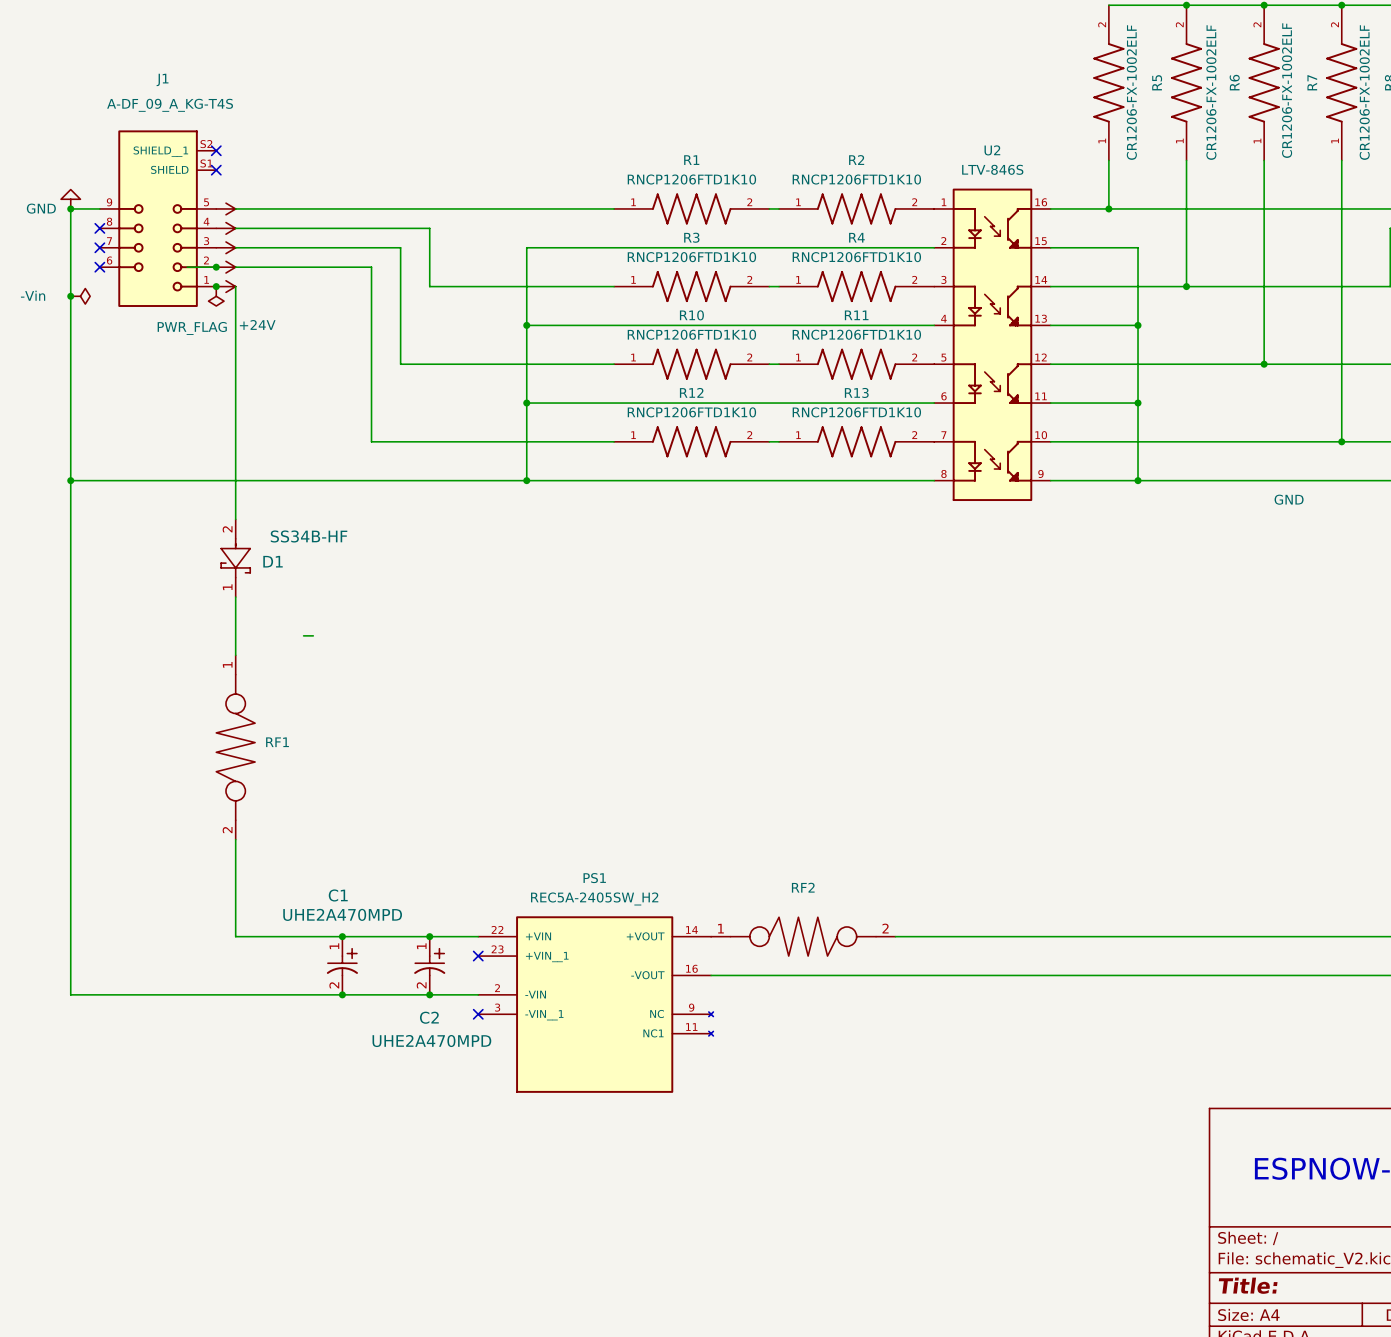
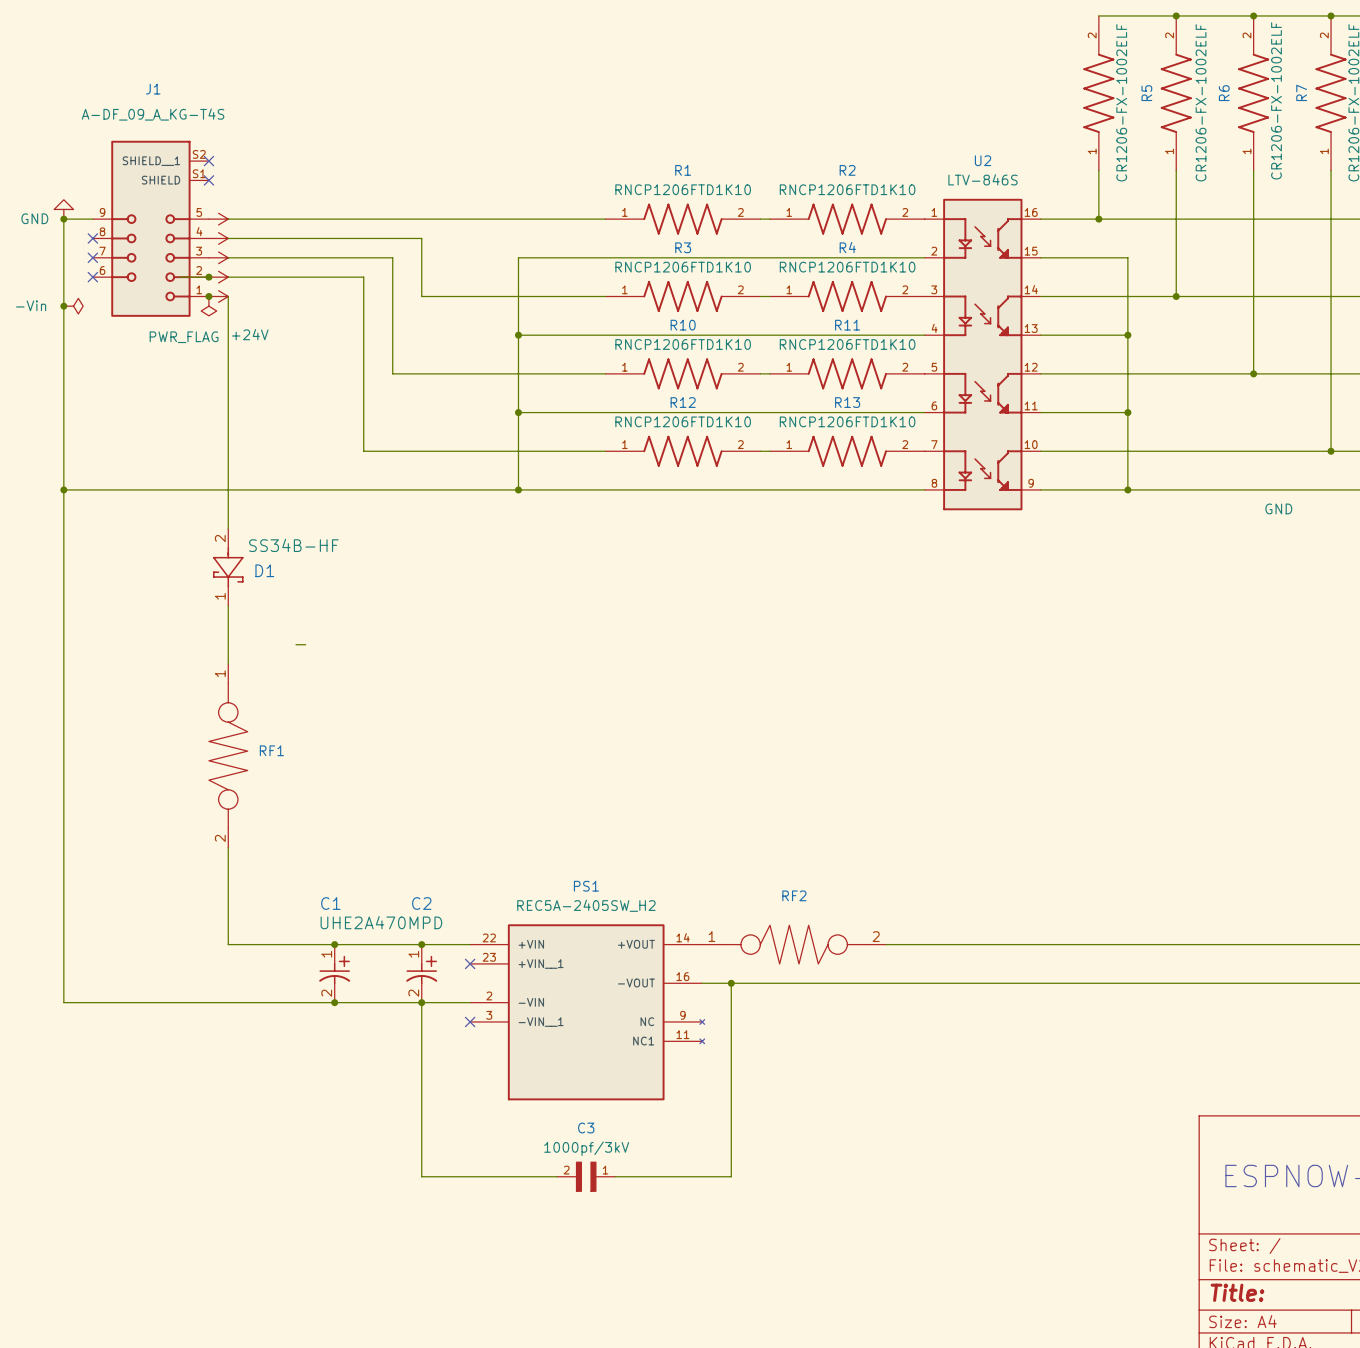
C1 value position: UHE2A470MPD (342, 914) -> UHE2A470MPD (381, 922)
wire: none -> (731, 983) (731, 1176) (615, 1176)
junction: none -> (731, 983)
wire: none -> (421, 1002) (421, 1176) (557, 1176)
C2 name position: C2 (429, 1017) -> C2 (421, 903)
C2 value: UHE2A470MPD (431, 1041) -> none
C3: none -> 1000pf/3kV (586, 1176)

